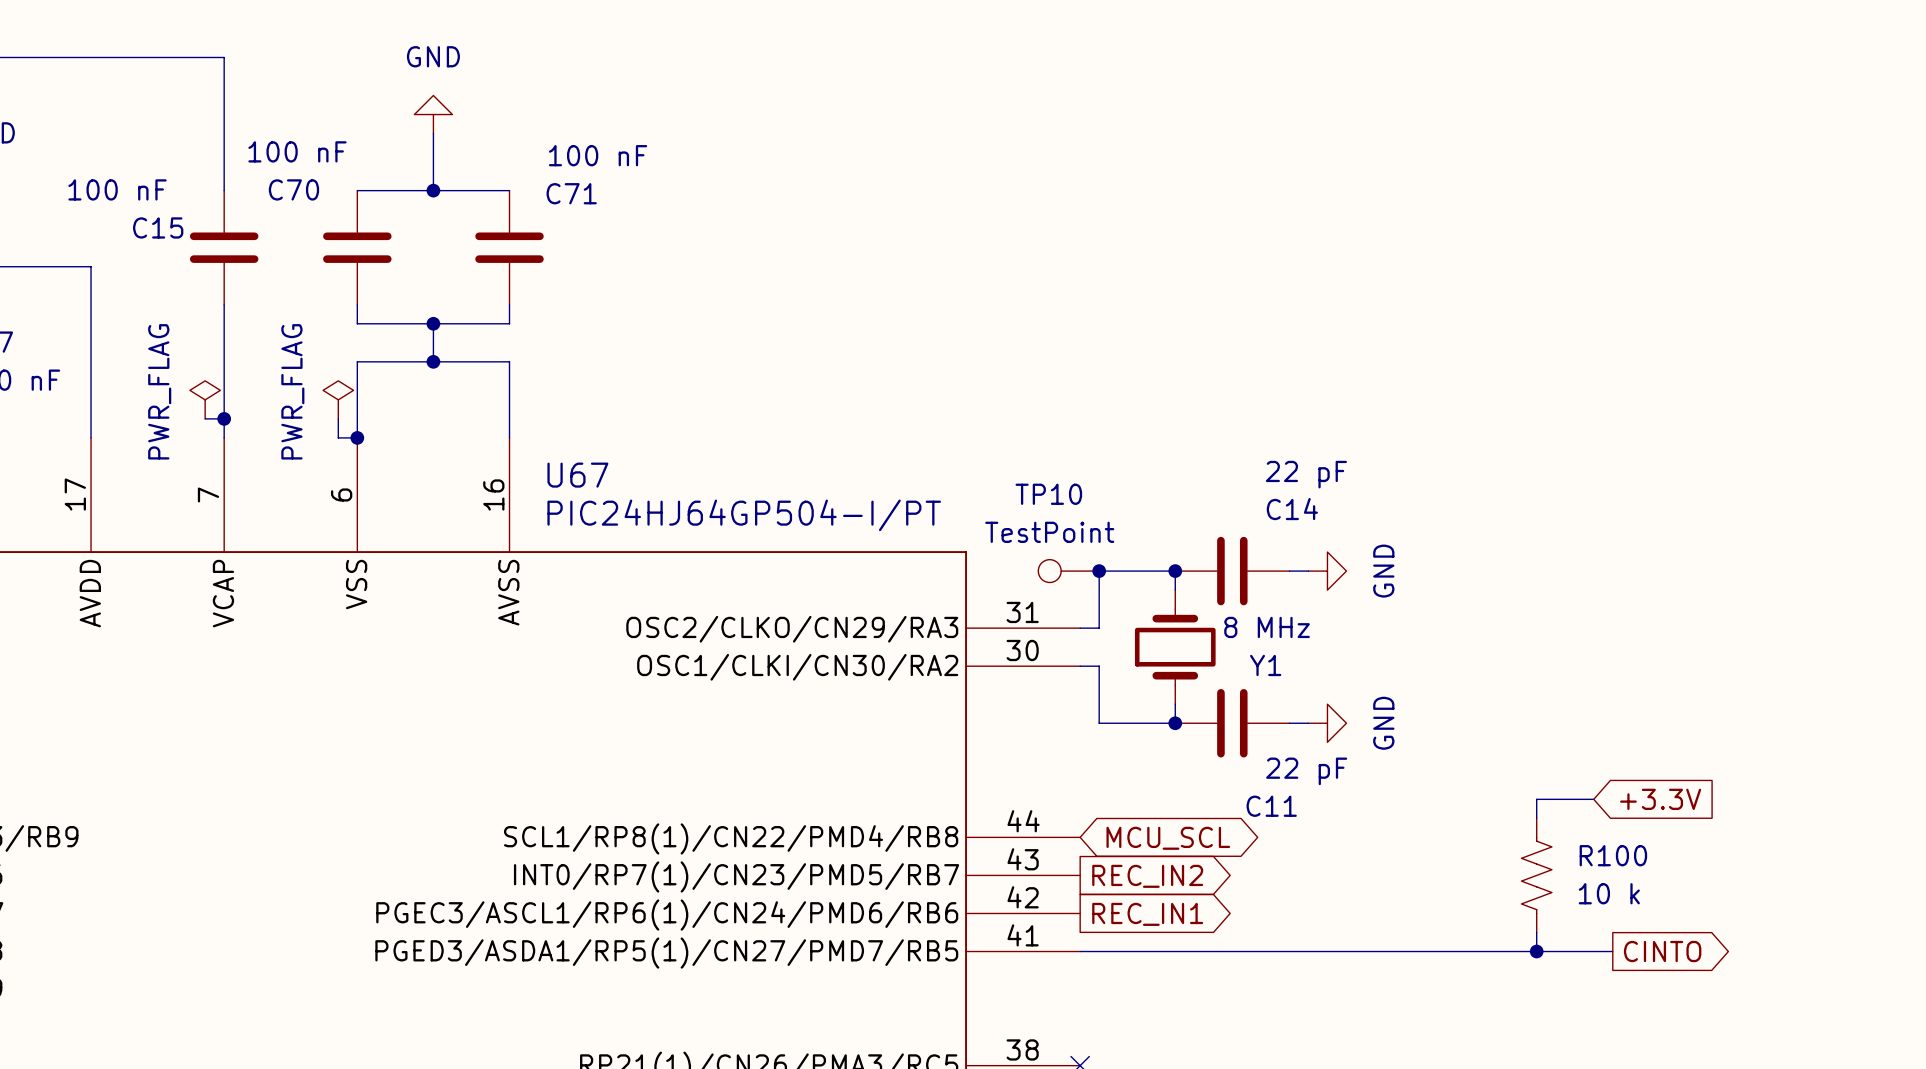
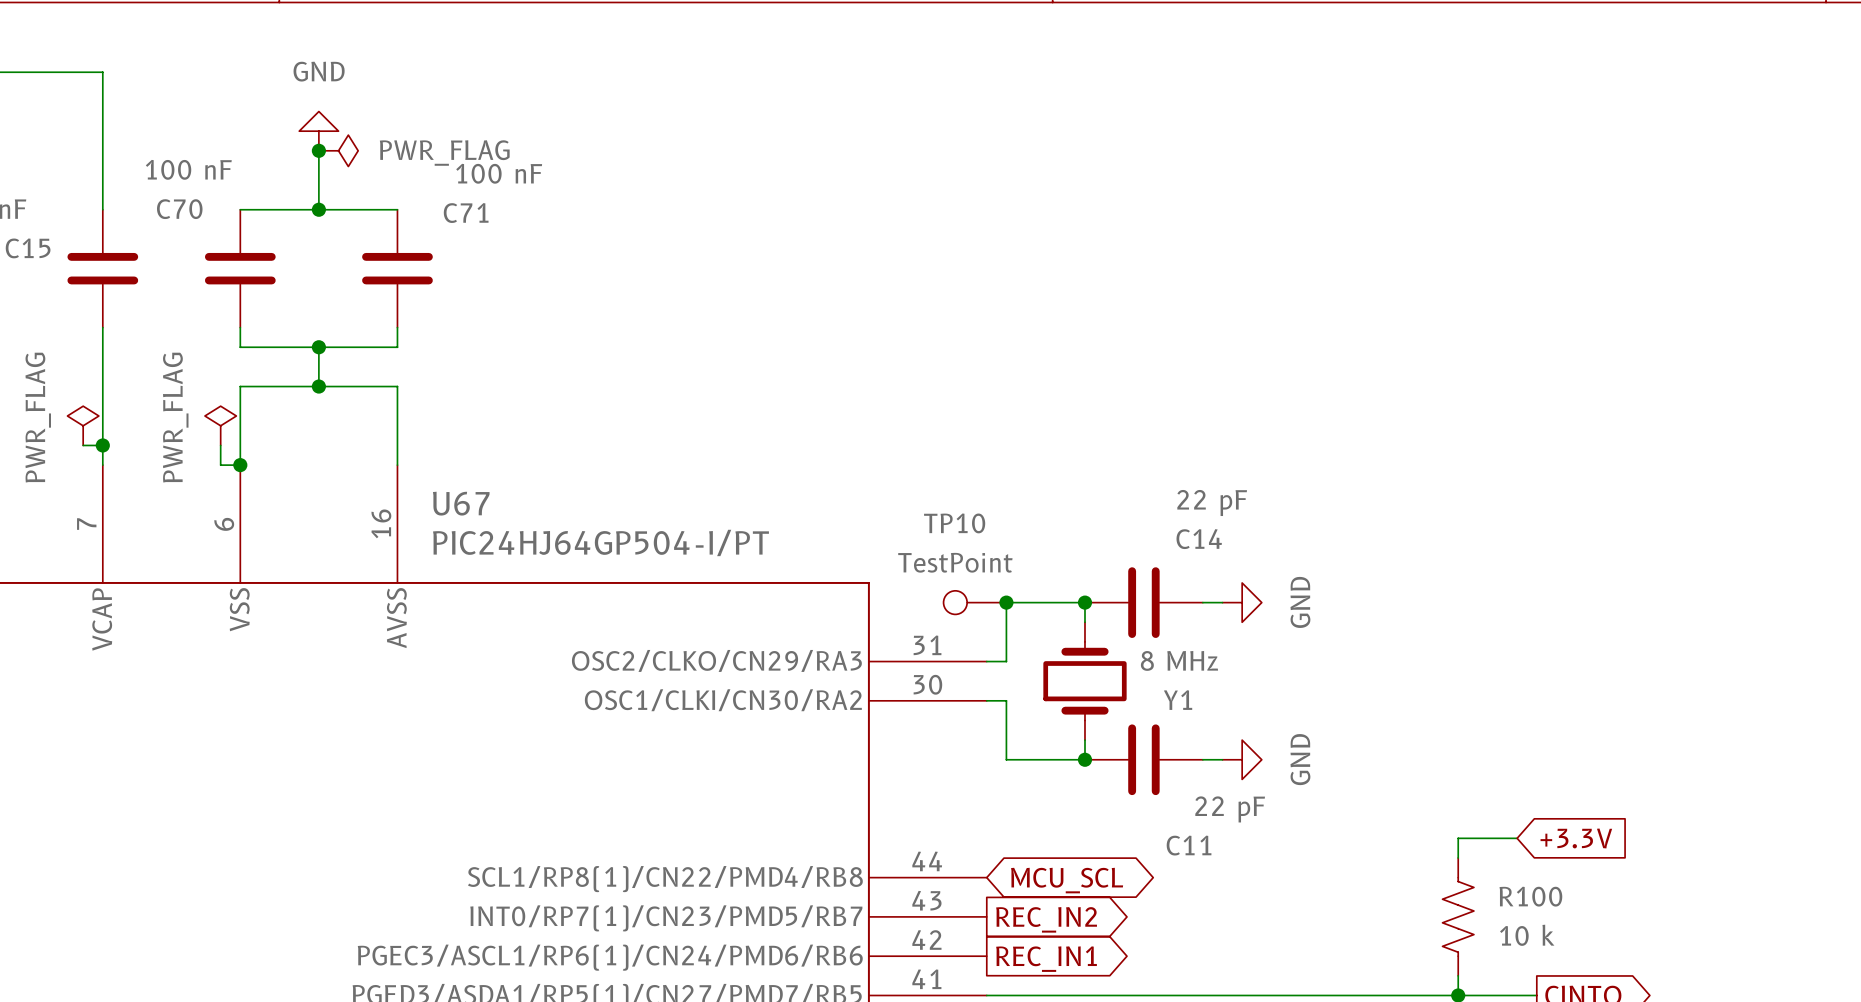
junction: none -> (318, 150)
power symbol: none -> PWR_FLAG (338, 150)

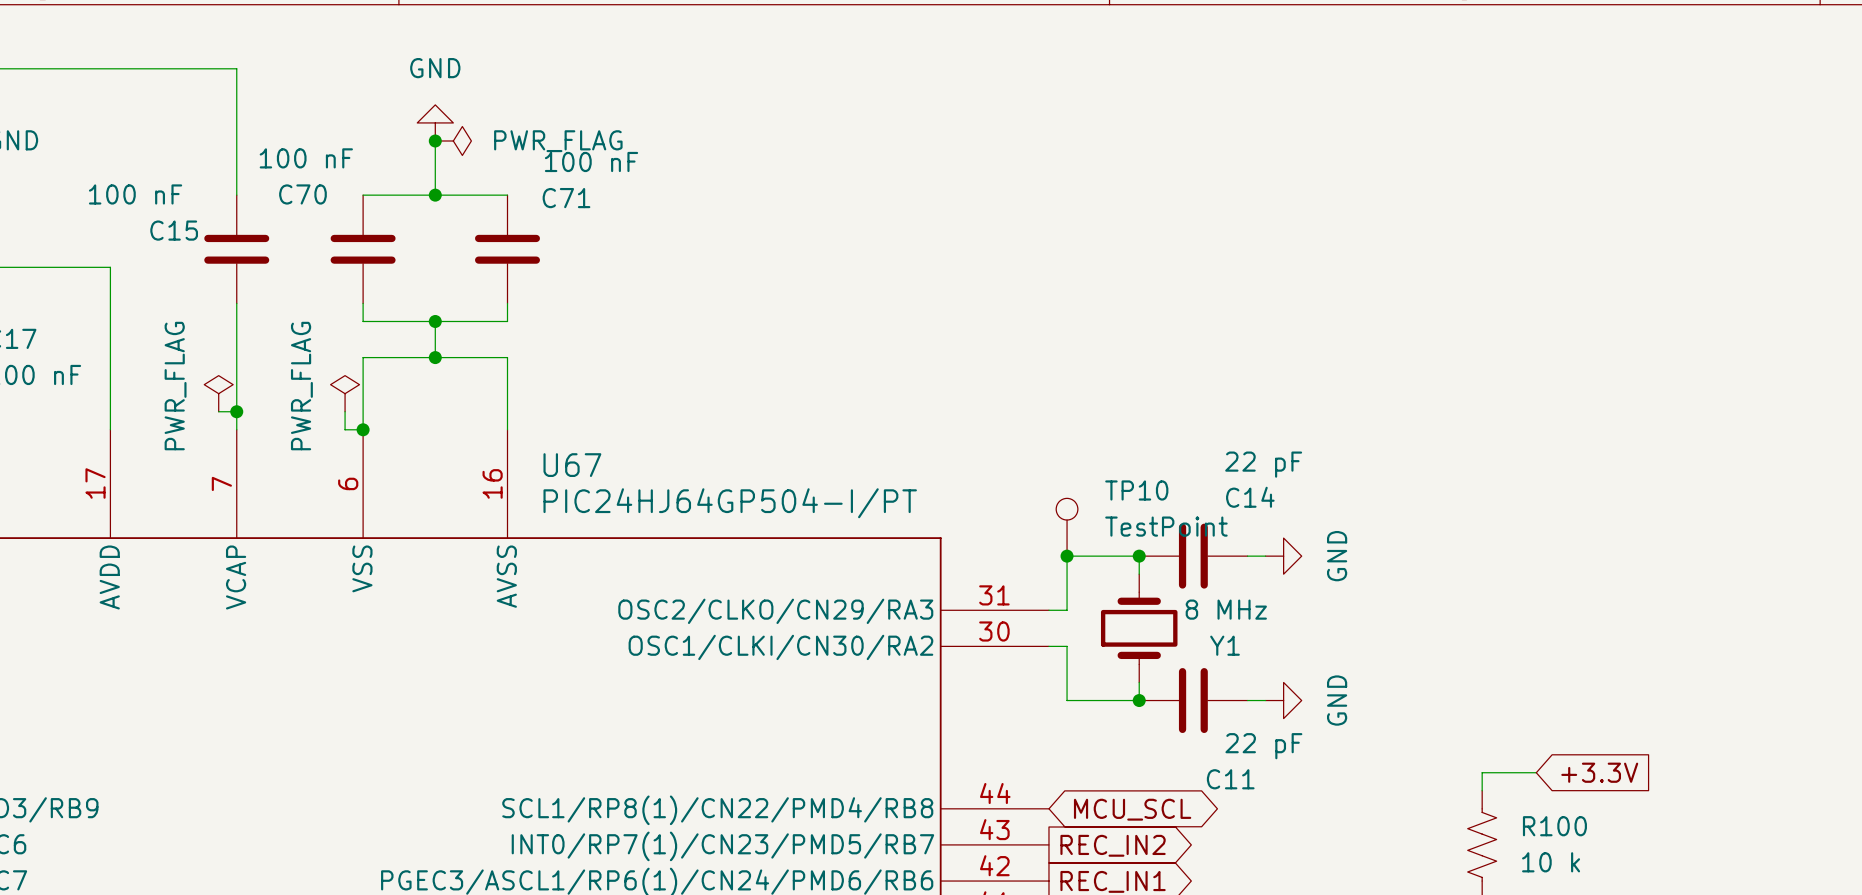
TP10 value position: TestPoint (955, 562) -> TestPoint (1166, 526)
TP10 rotation: 0° (955, 602) -> 90° clockwise (1067, 509)
TP10 position: (974, 602) -> (1067, 527)

